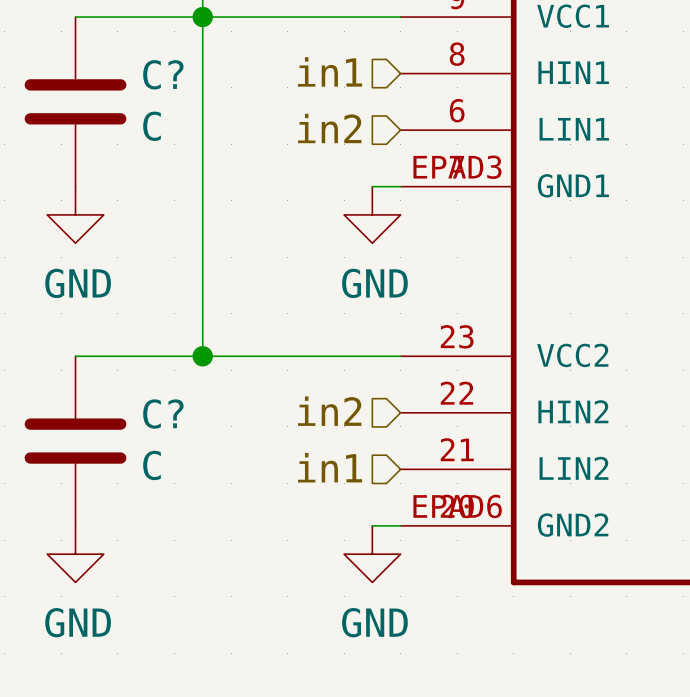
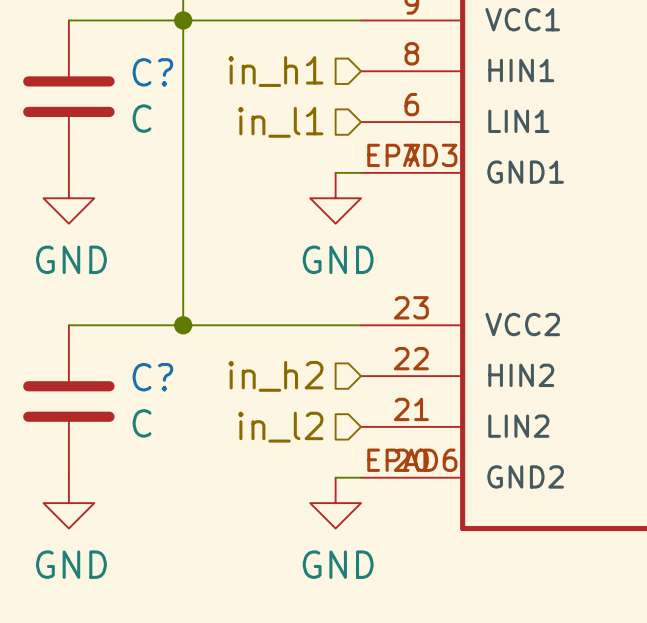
hierarchical label: in1 (330, 71) -> in_h1 (275, 71)
hierarchical label: in2 (329, 128) -> in_l1 (280, 122)
hierarchical label: in2 (329, 411) -> in_h2 (275, 376)
hierarchical label: in1 (330, 467) -> in_l2 (280, 427)

